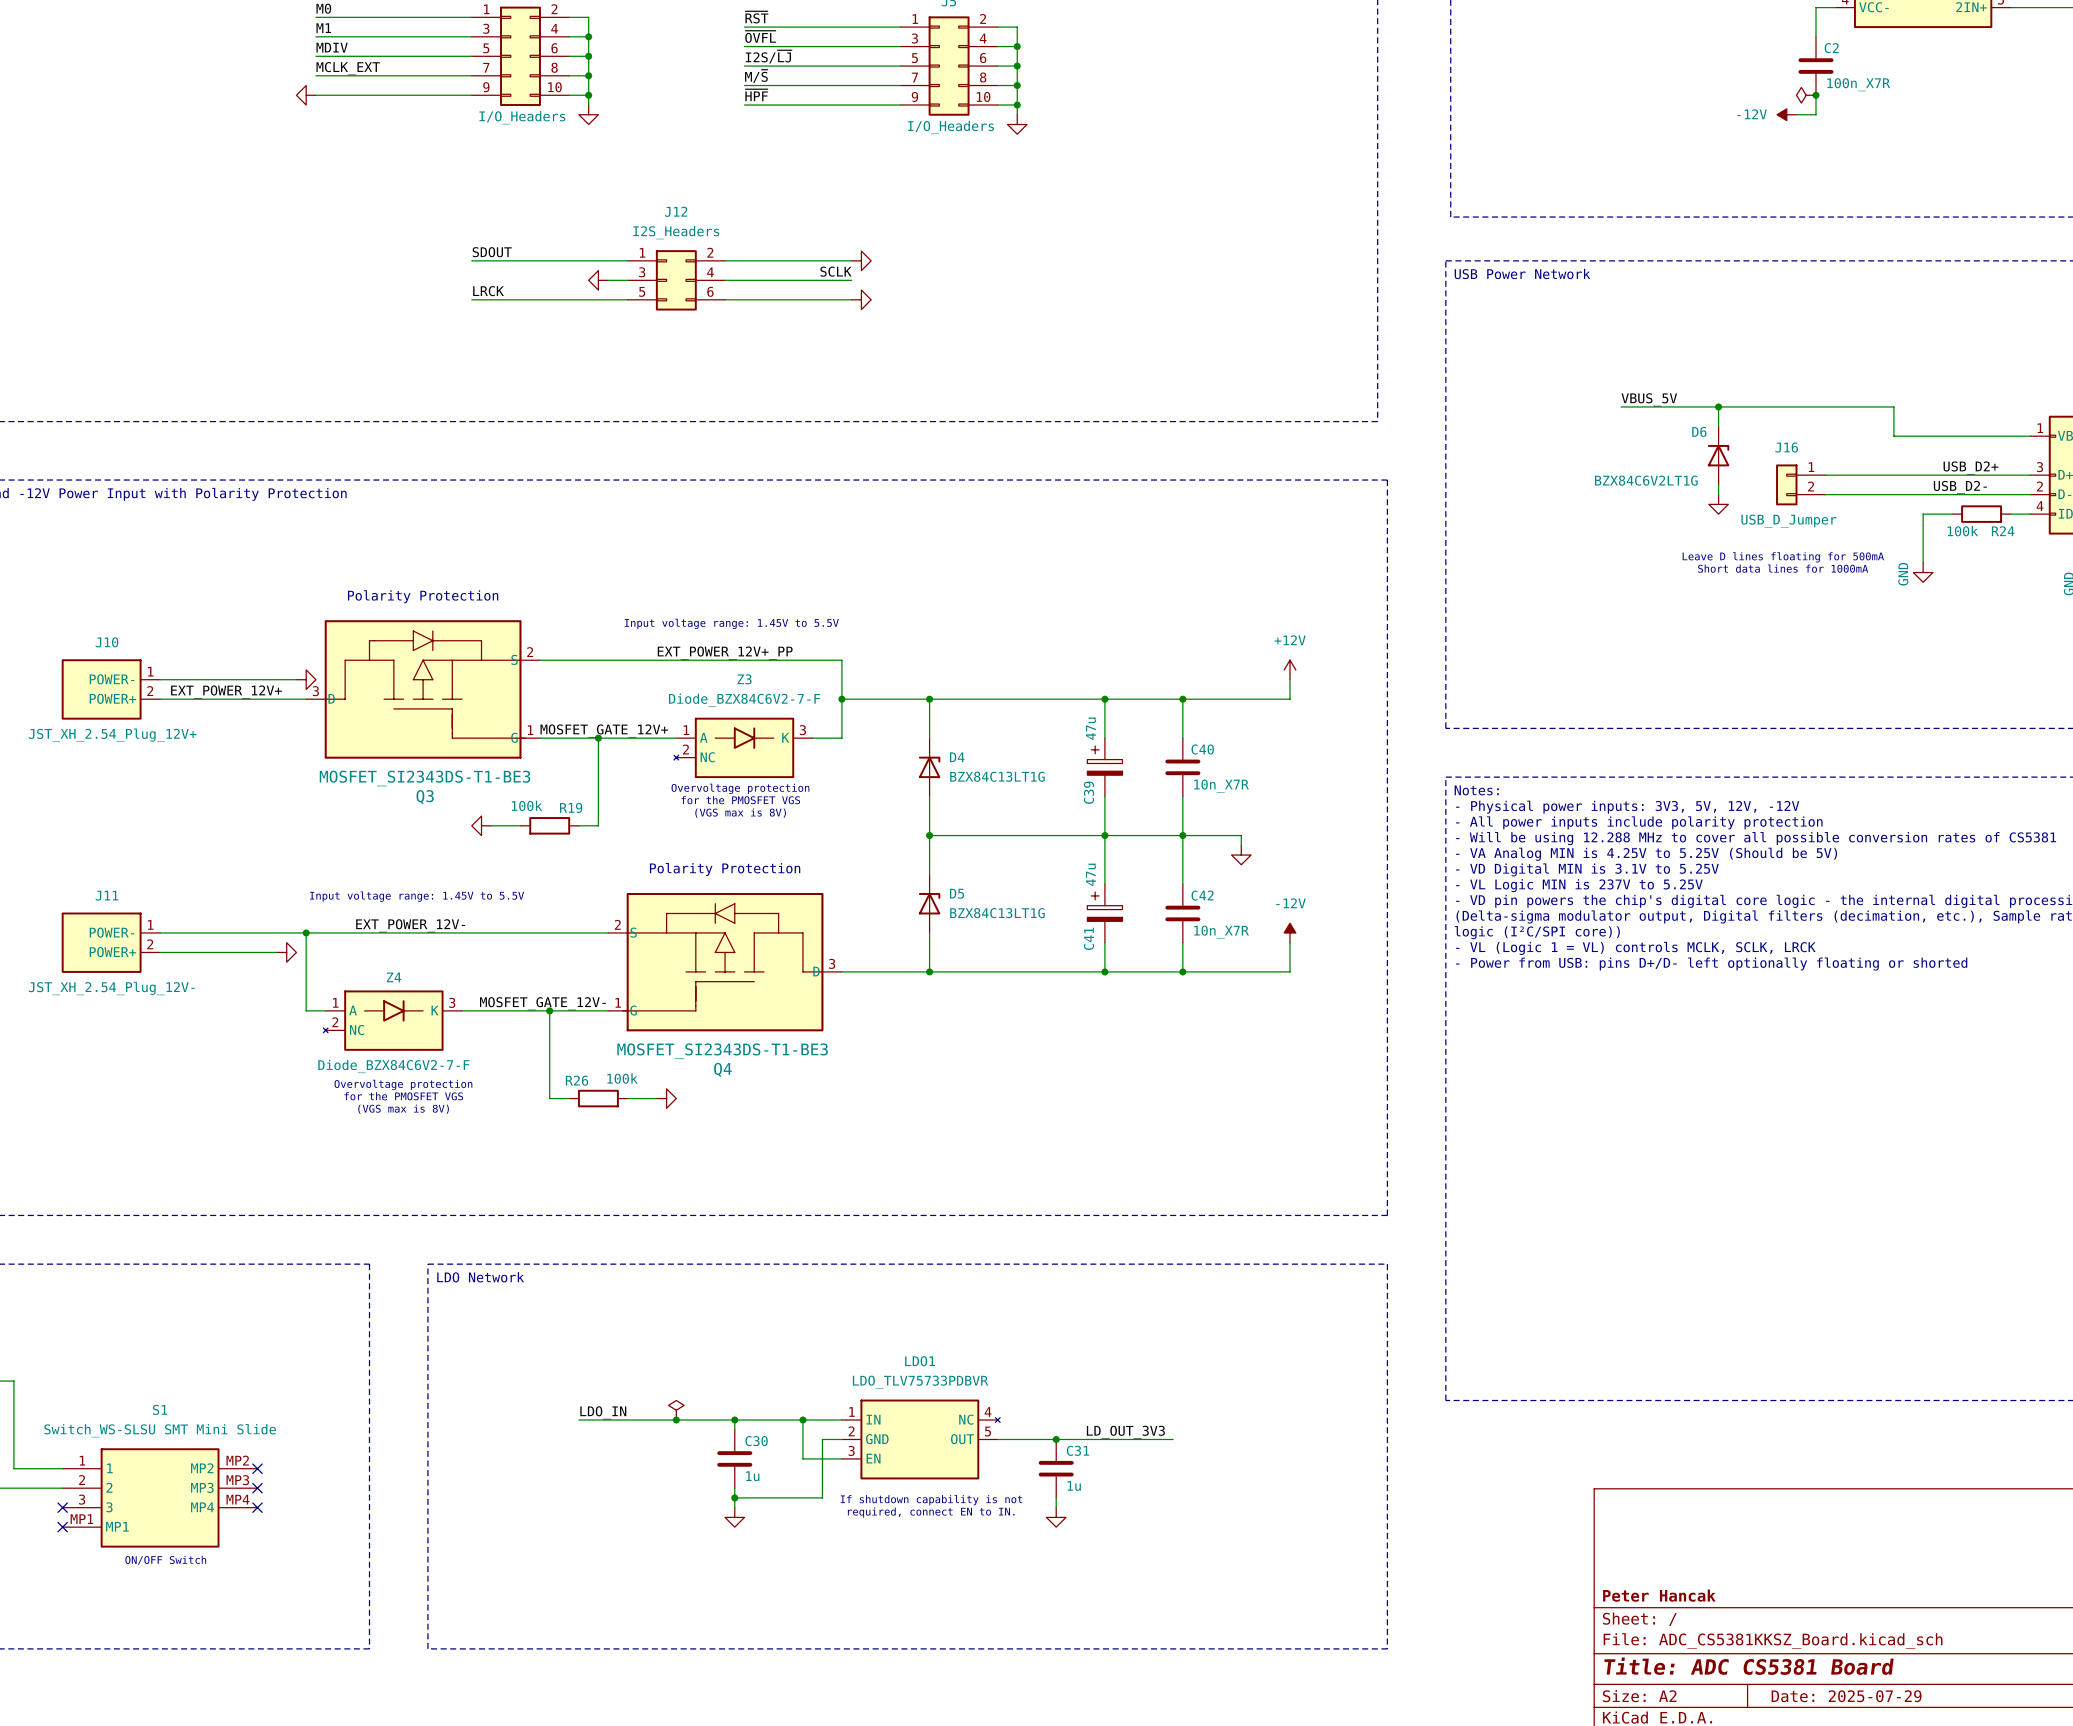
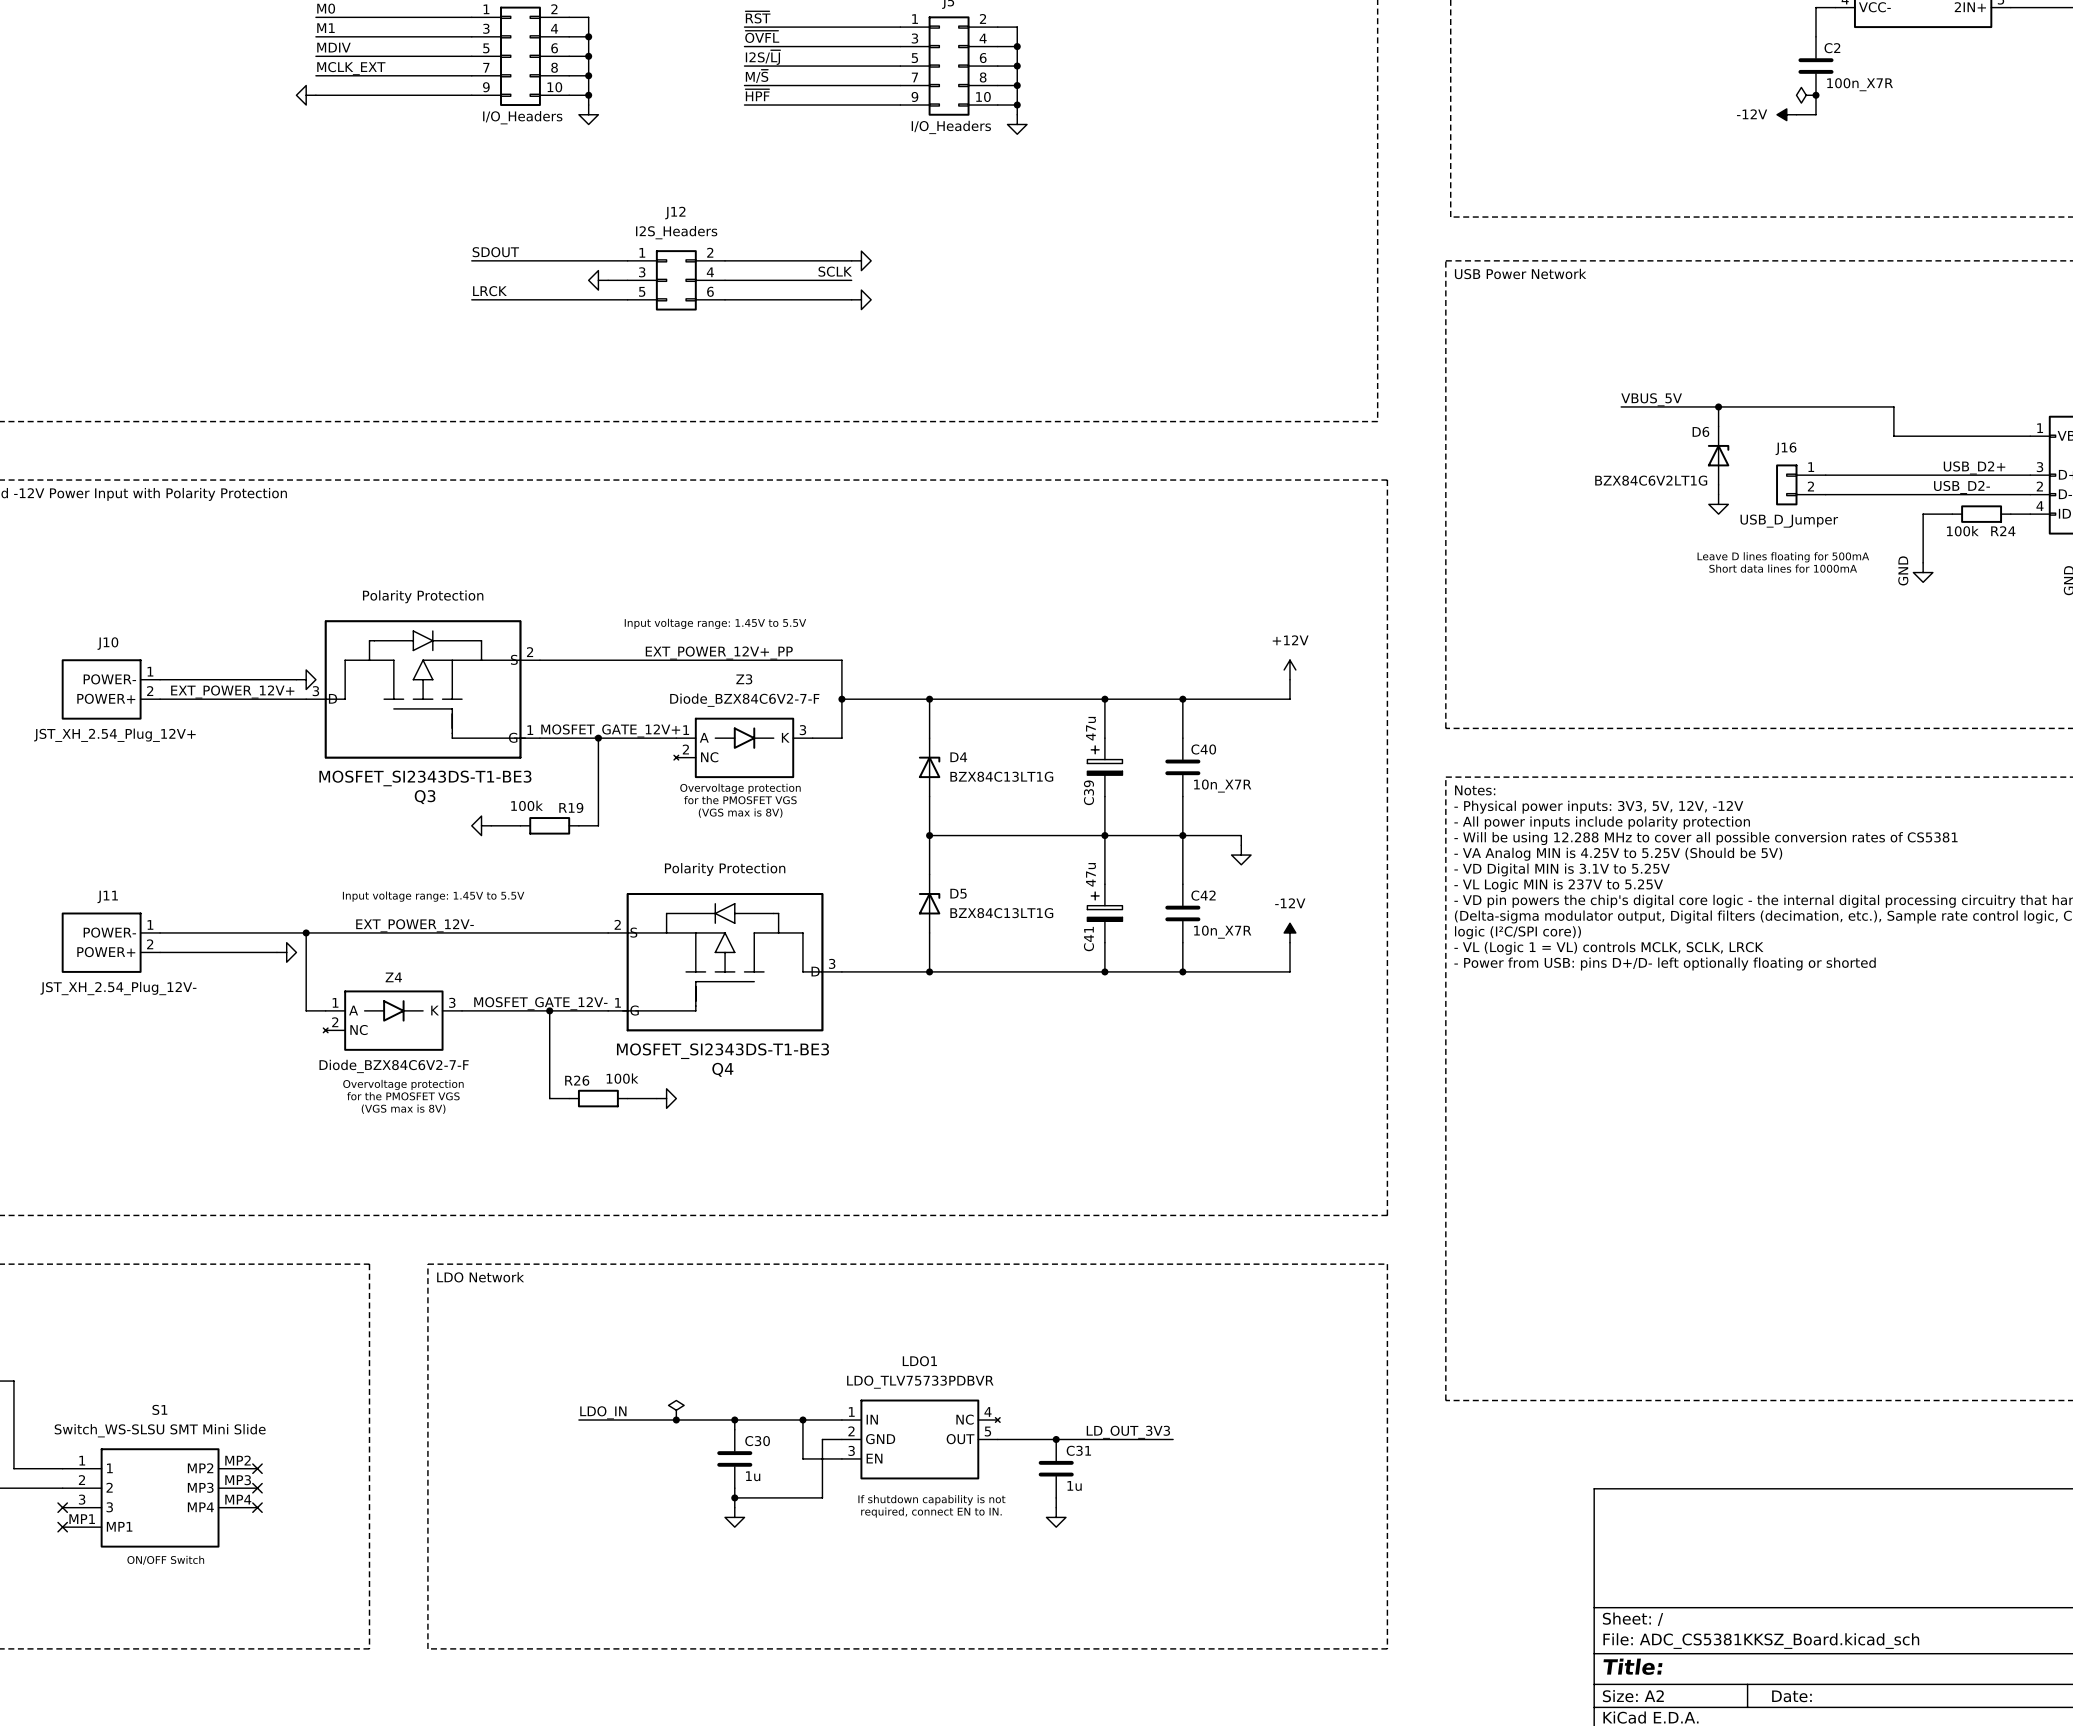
title block: Peter Hancak (1659, 1595) -> none
title block: Title: ADC CS5381 Board (1749, 1666) -> Title: (1632, 1666)
title block: Date: 2025-07-29 (1846, 1696) -> Date: (1791, 1696)

